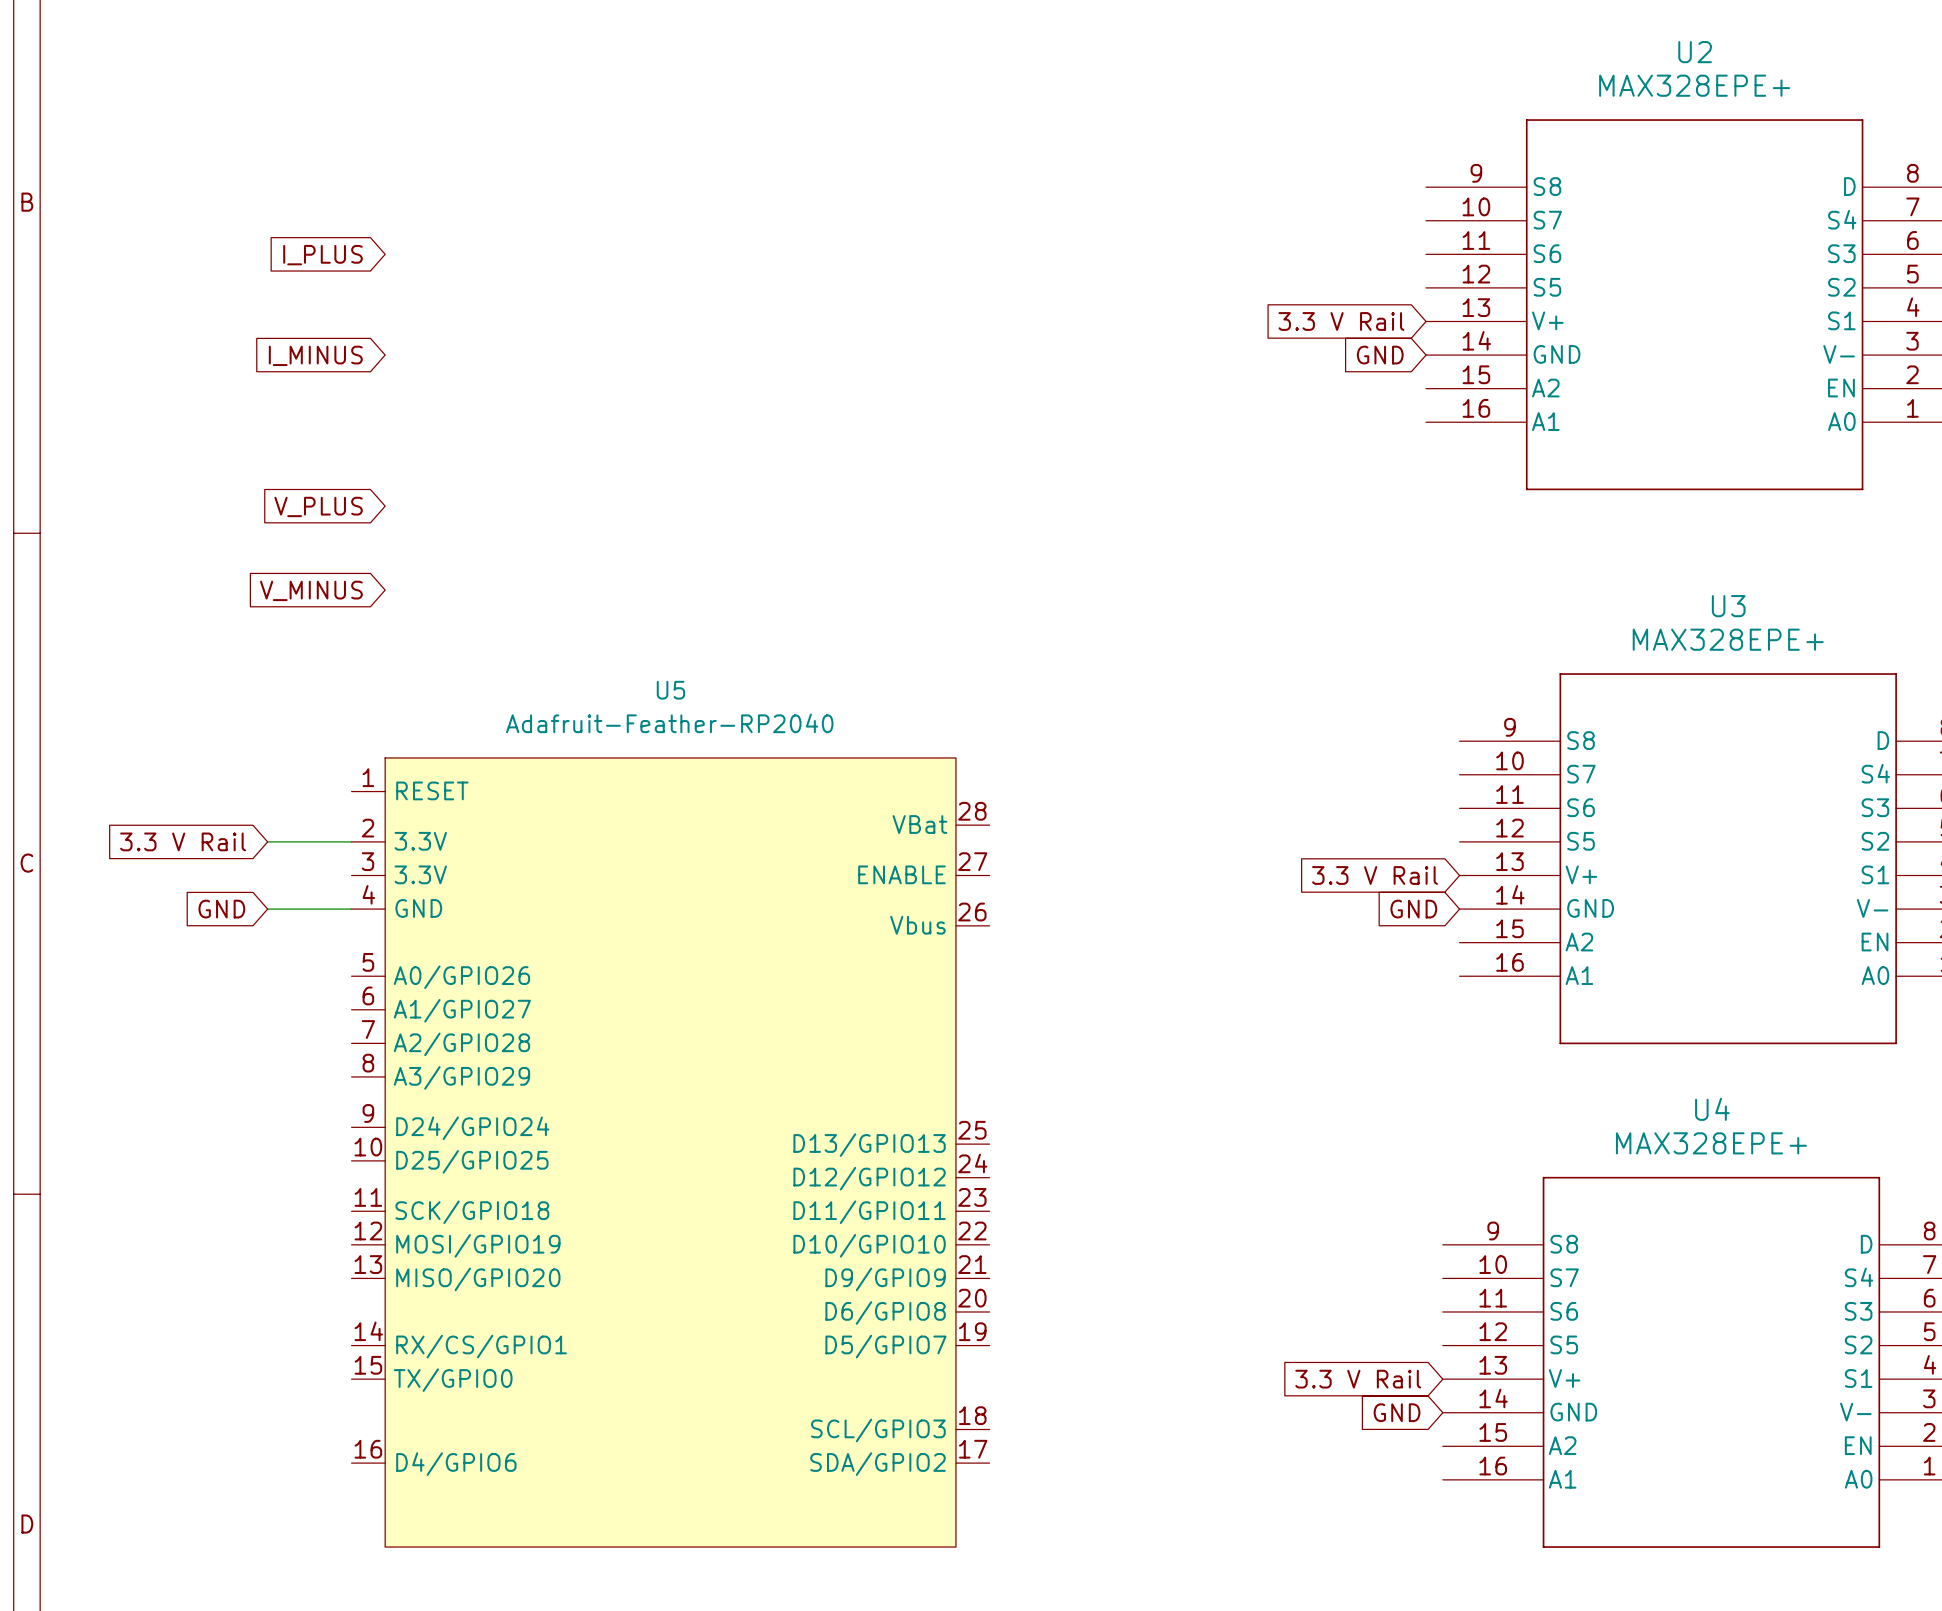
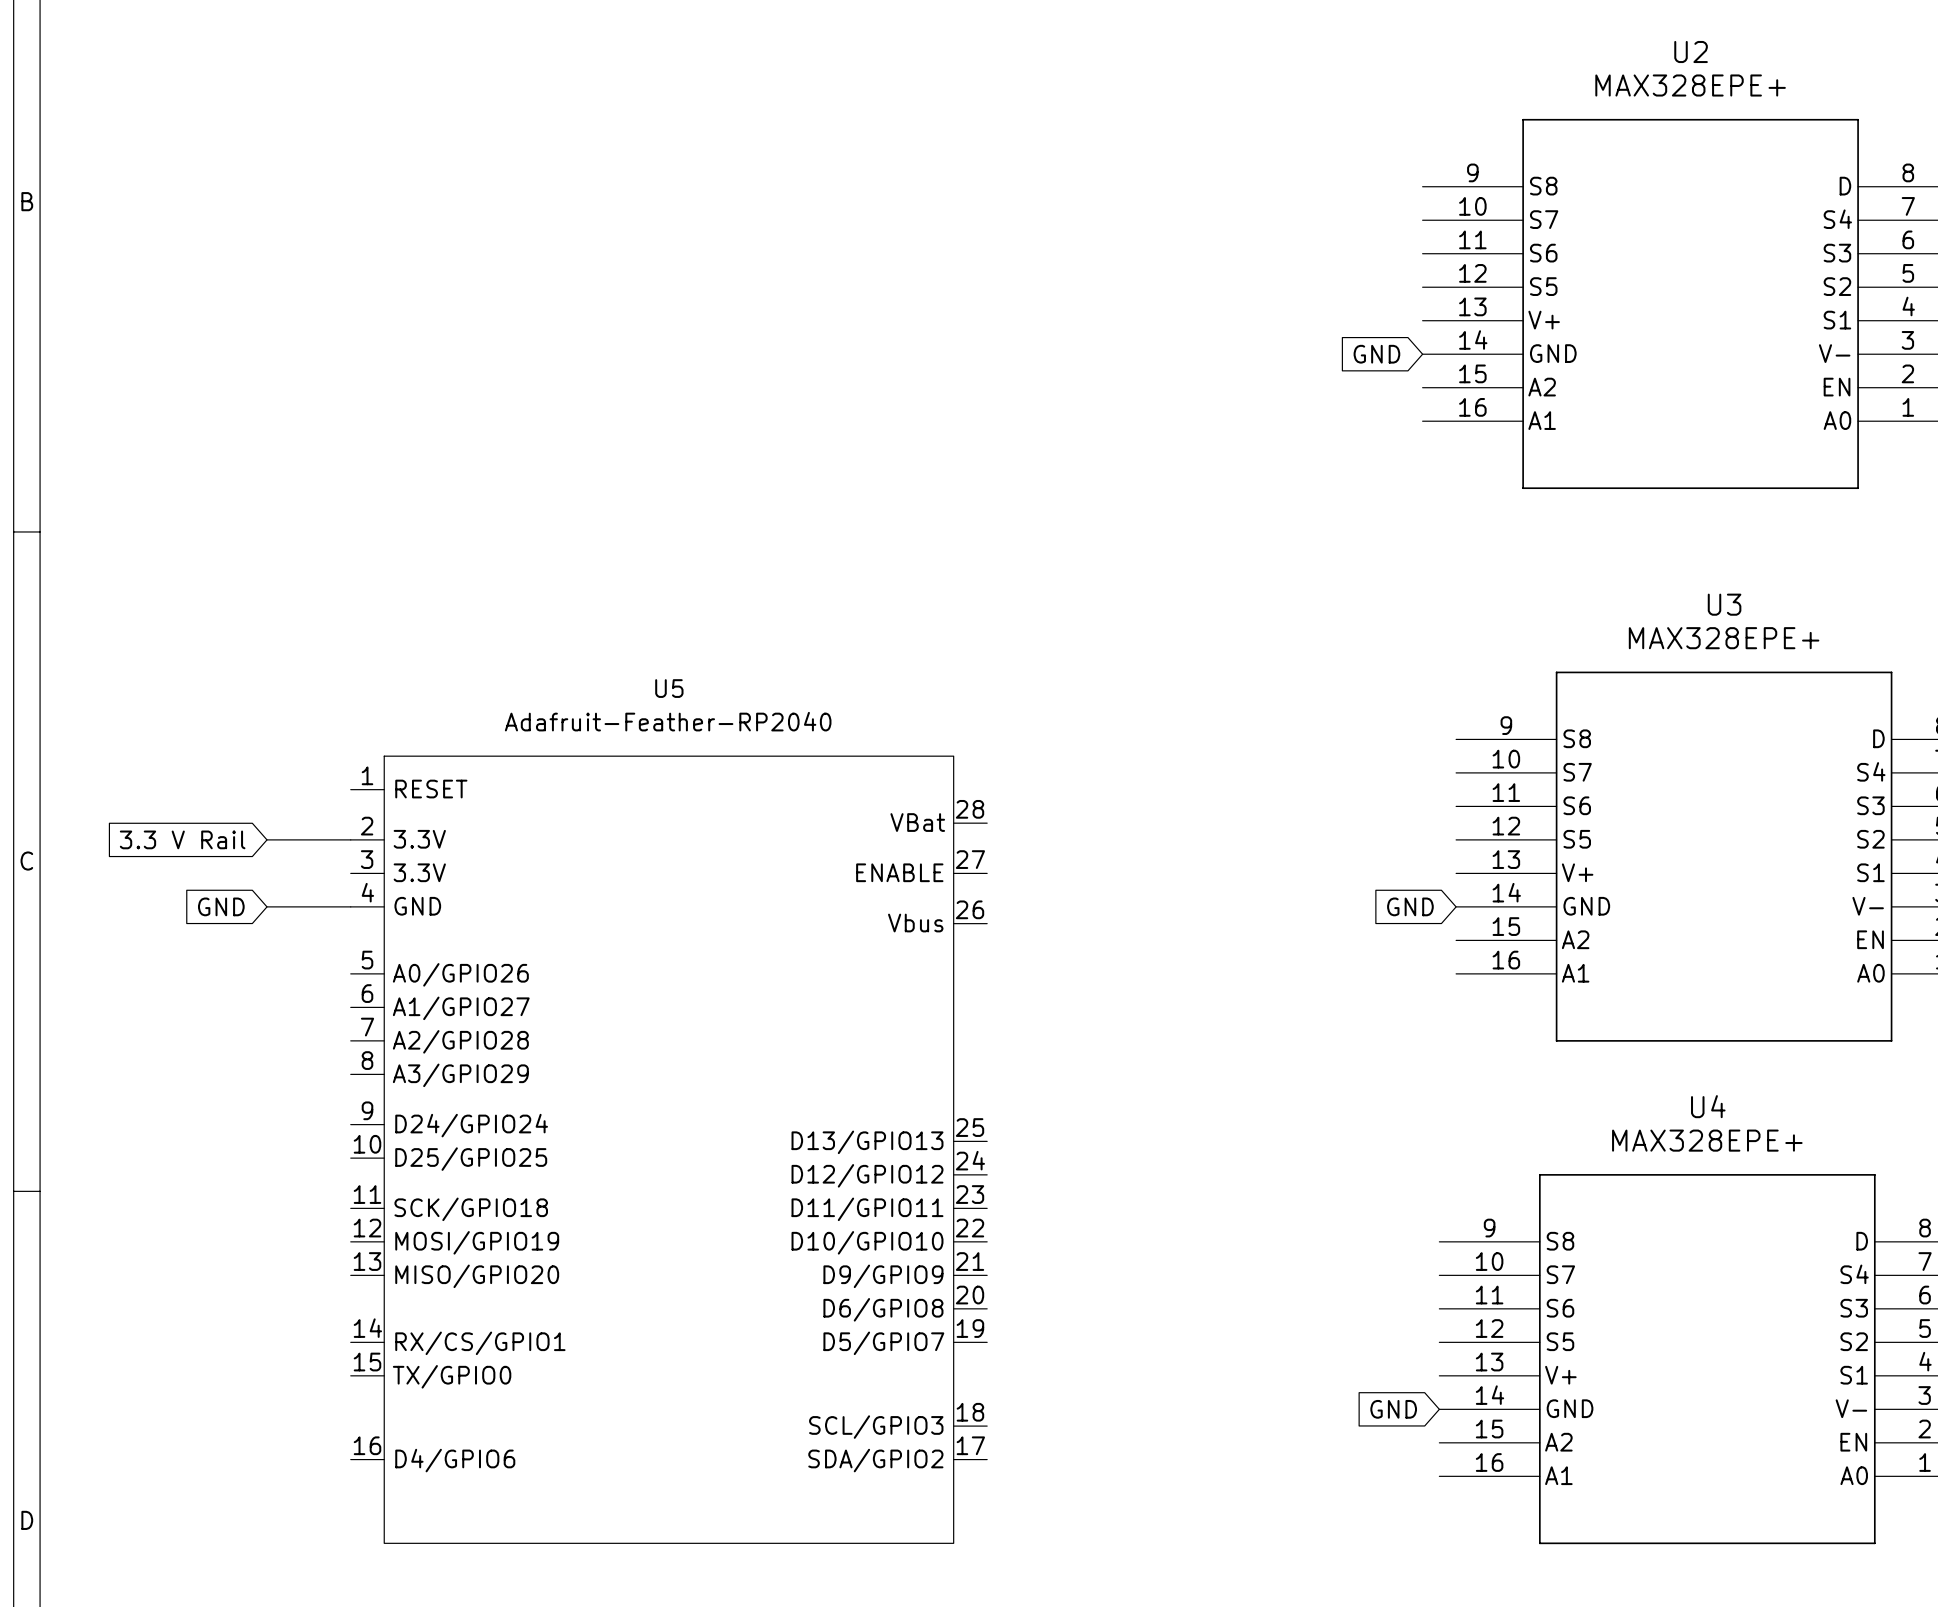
global label: I_PLUS (322, 255) -> none
global label: 3.3 V Rail (1341, 321) -> none
global label: I_MINUS (315, 355) -> none
global label: V_PLUS (318, 506) -> none
global label: V_MINUS (311, 590) -> none
global label: 3.3 V Rail (1375, 875) -> none
global label: 3.3 V Rail (1358, 1379) -> none

